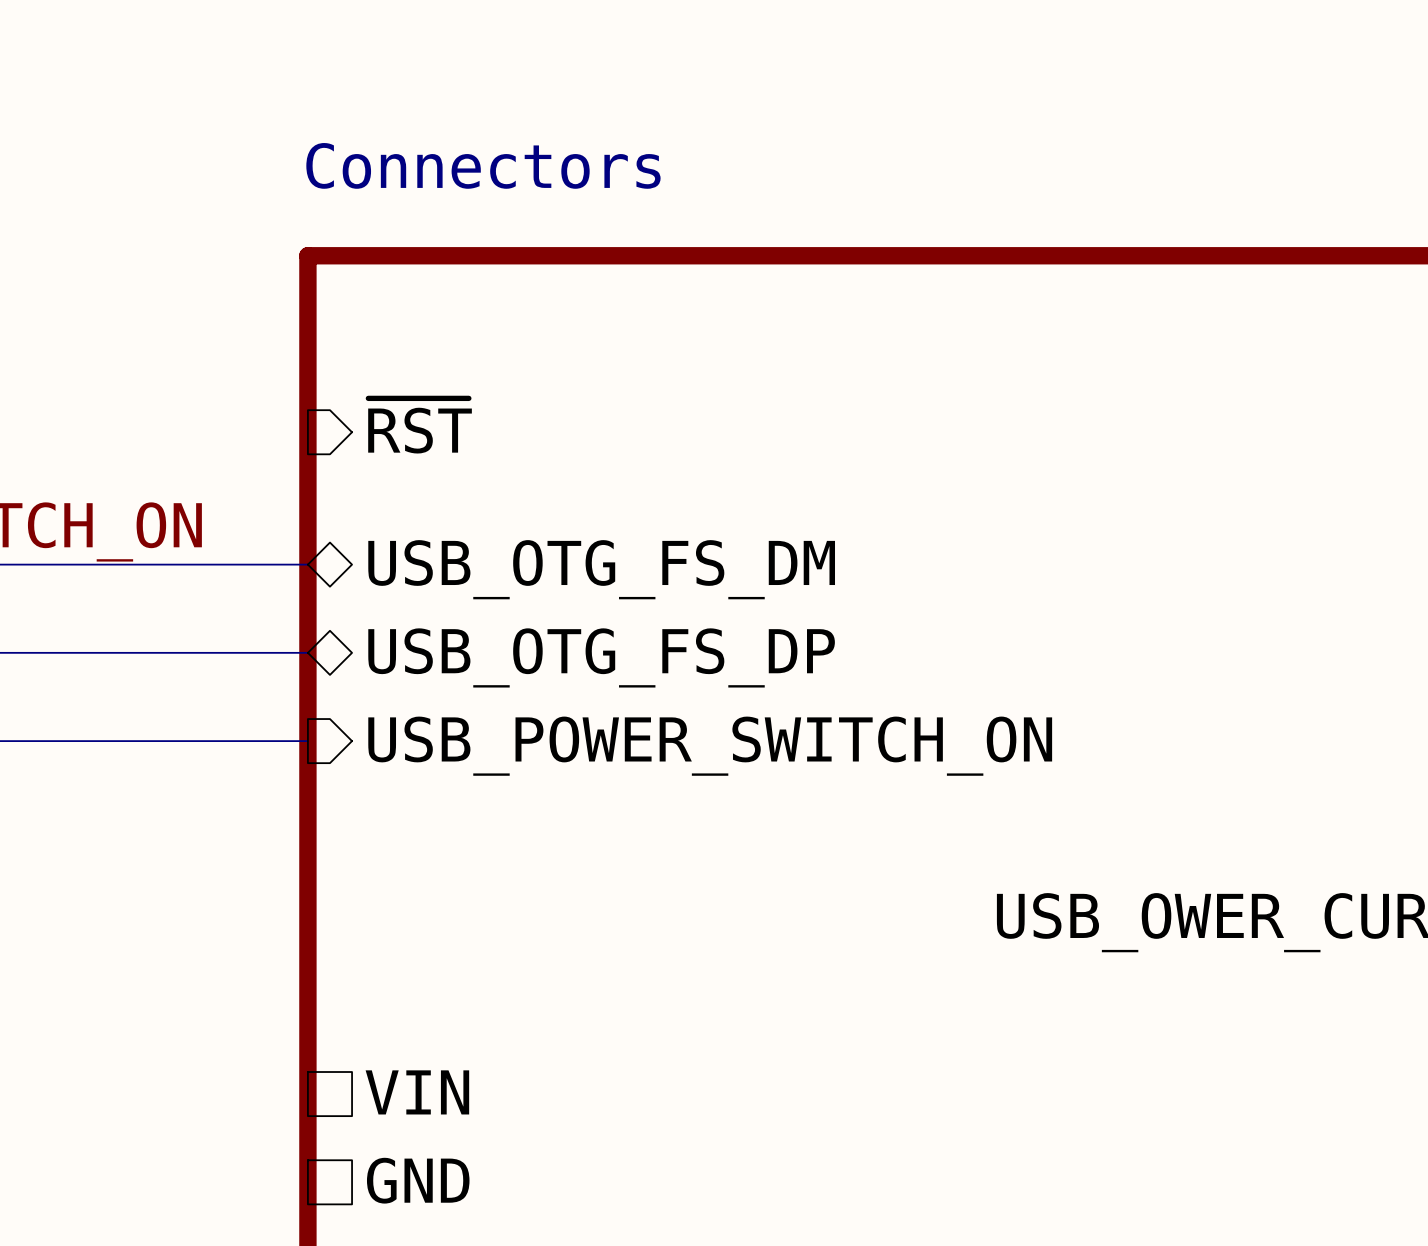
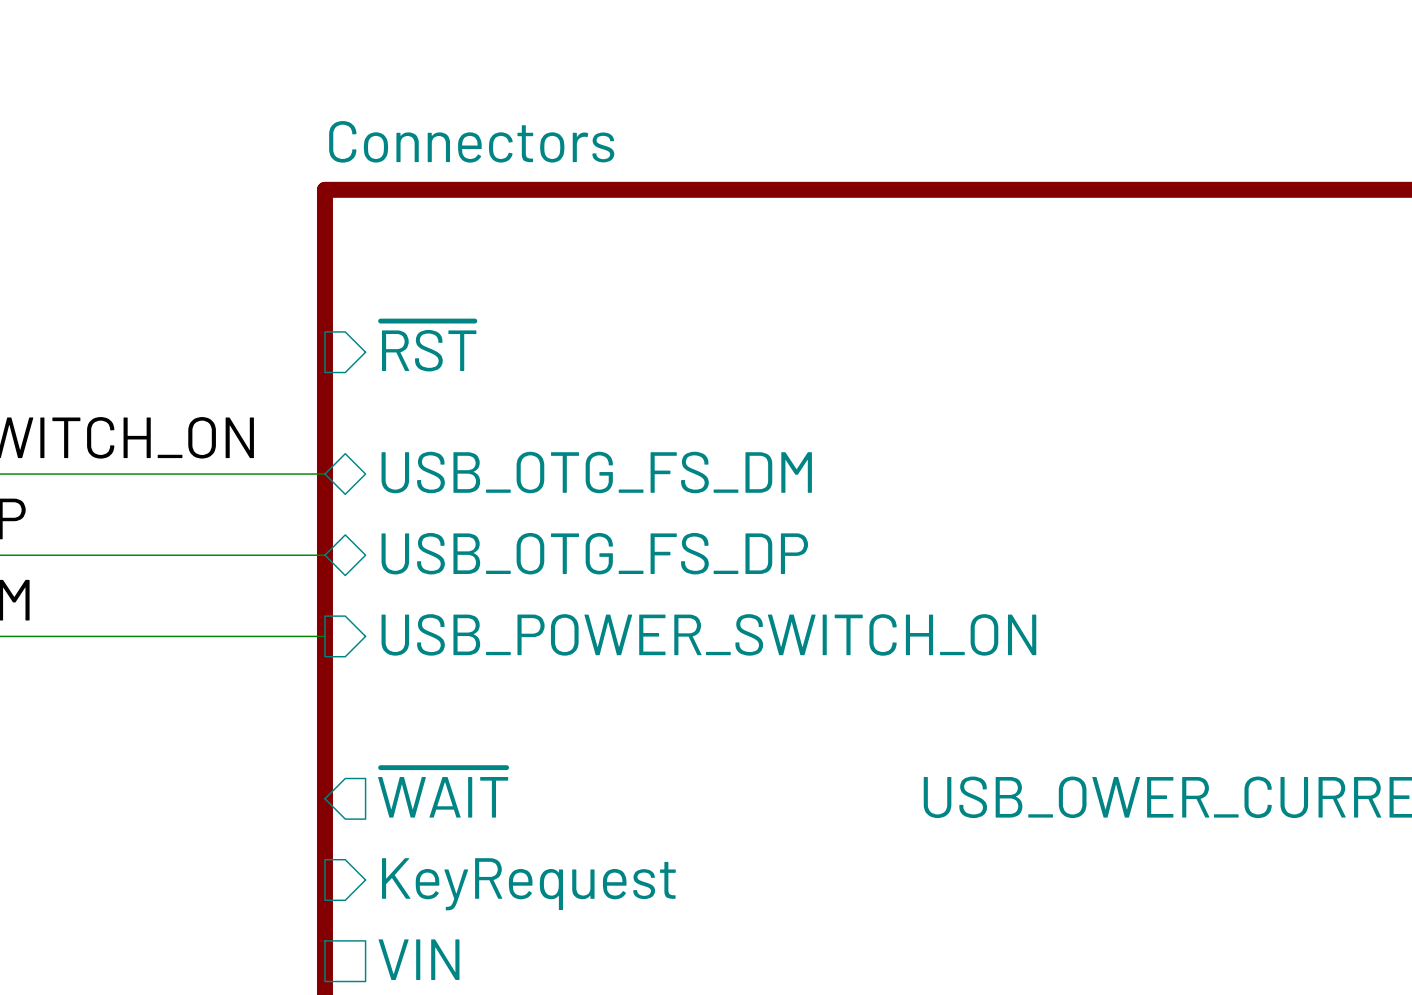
sheet Connectors name position: Connectors (483, 165) -> Connectors (471, 141)
sheet pin: none -> ~{WAIT} (443, 792)
sheet pin: none -> KeyRequest (528, 884)

